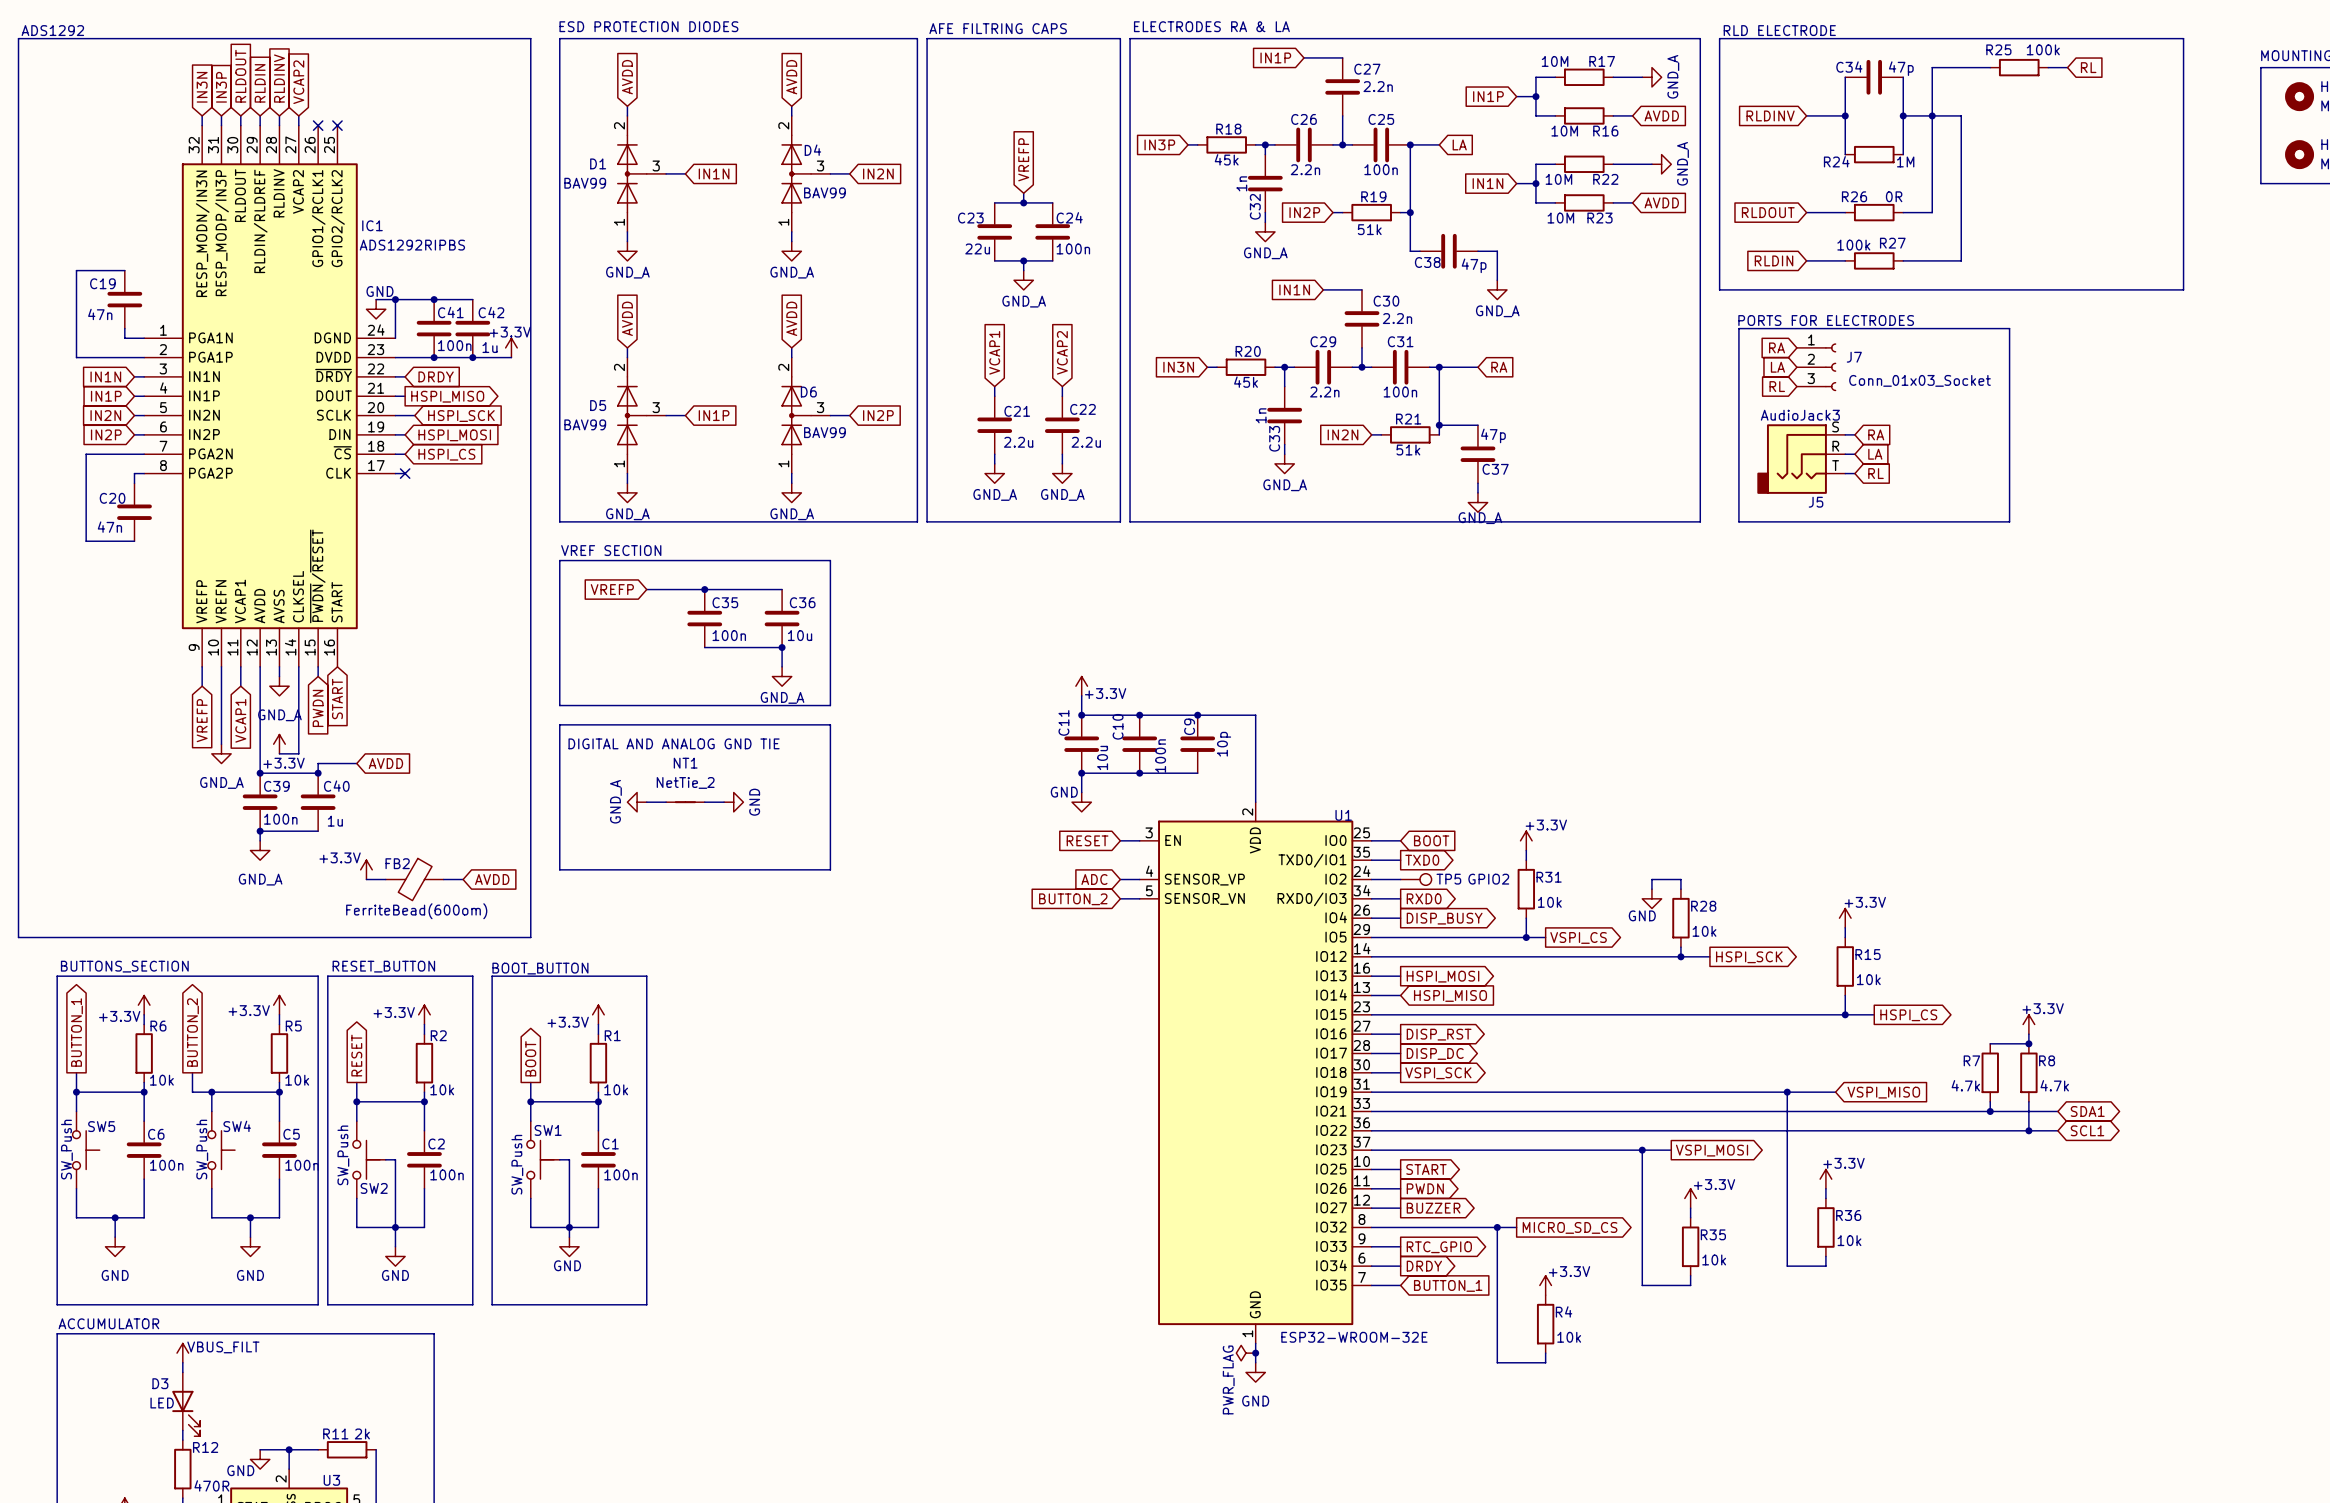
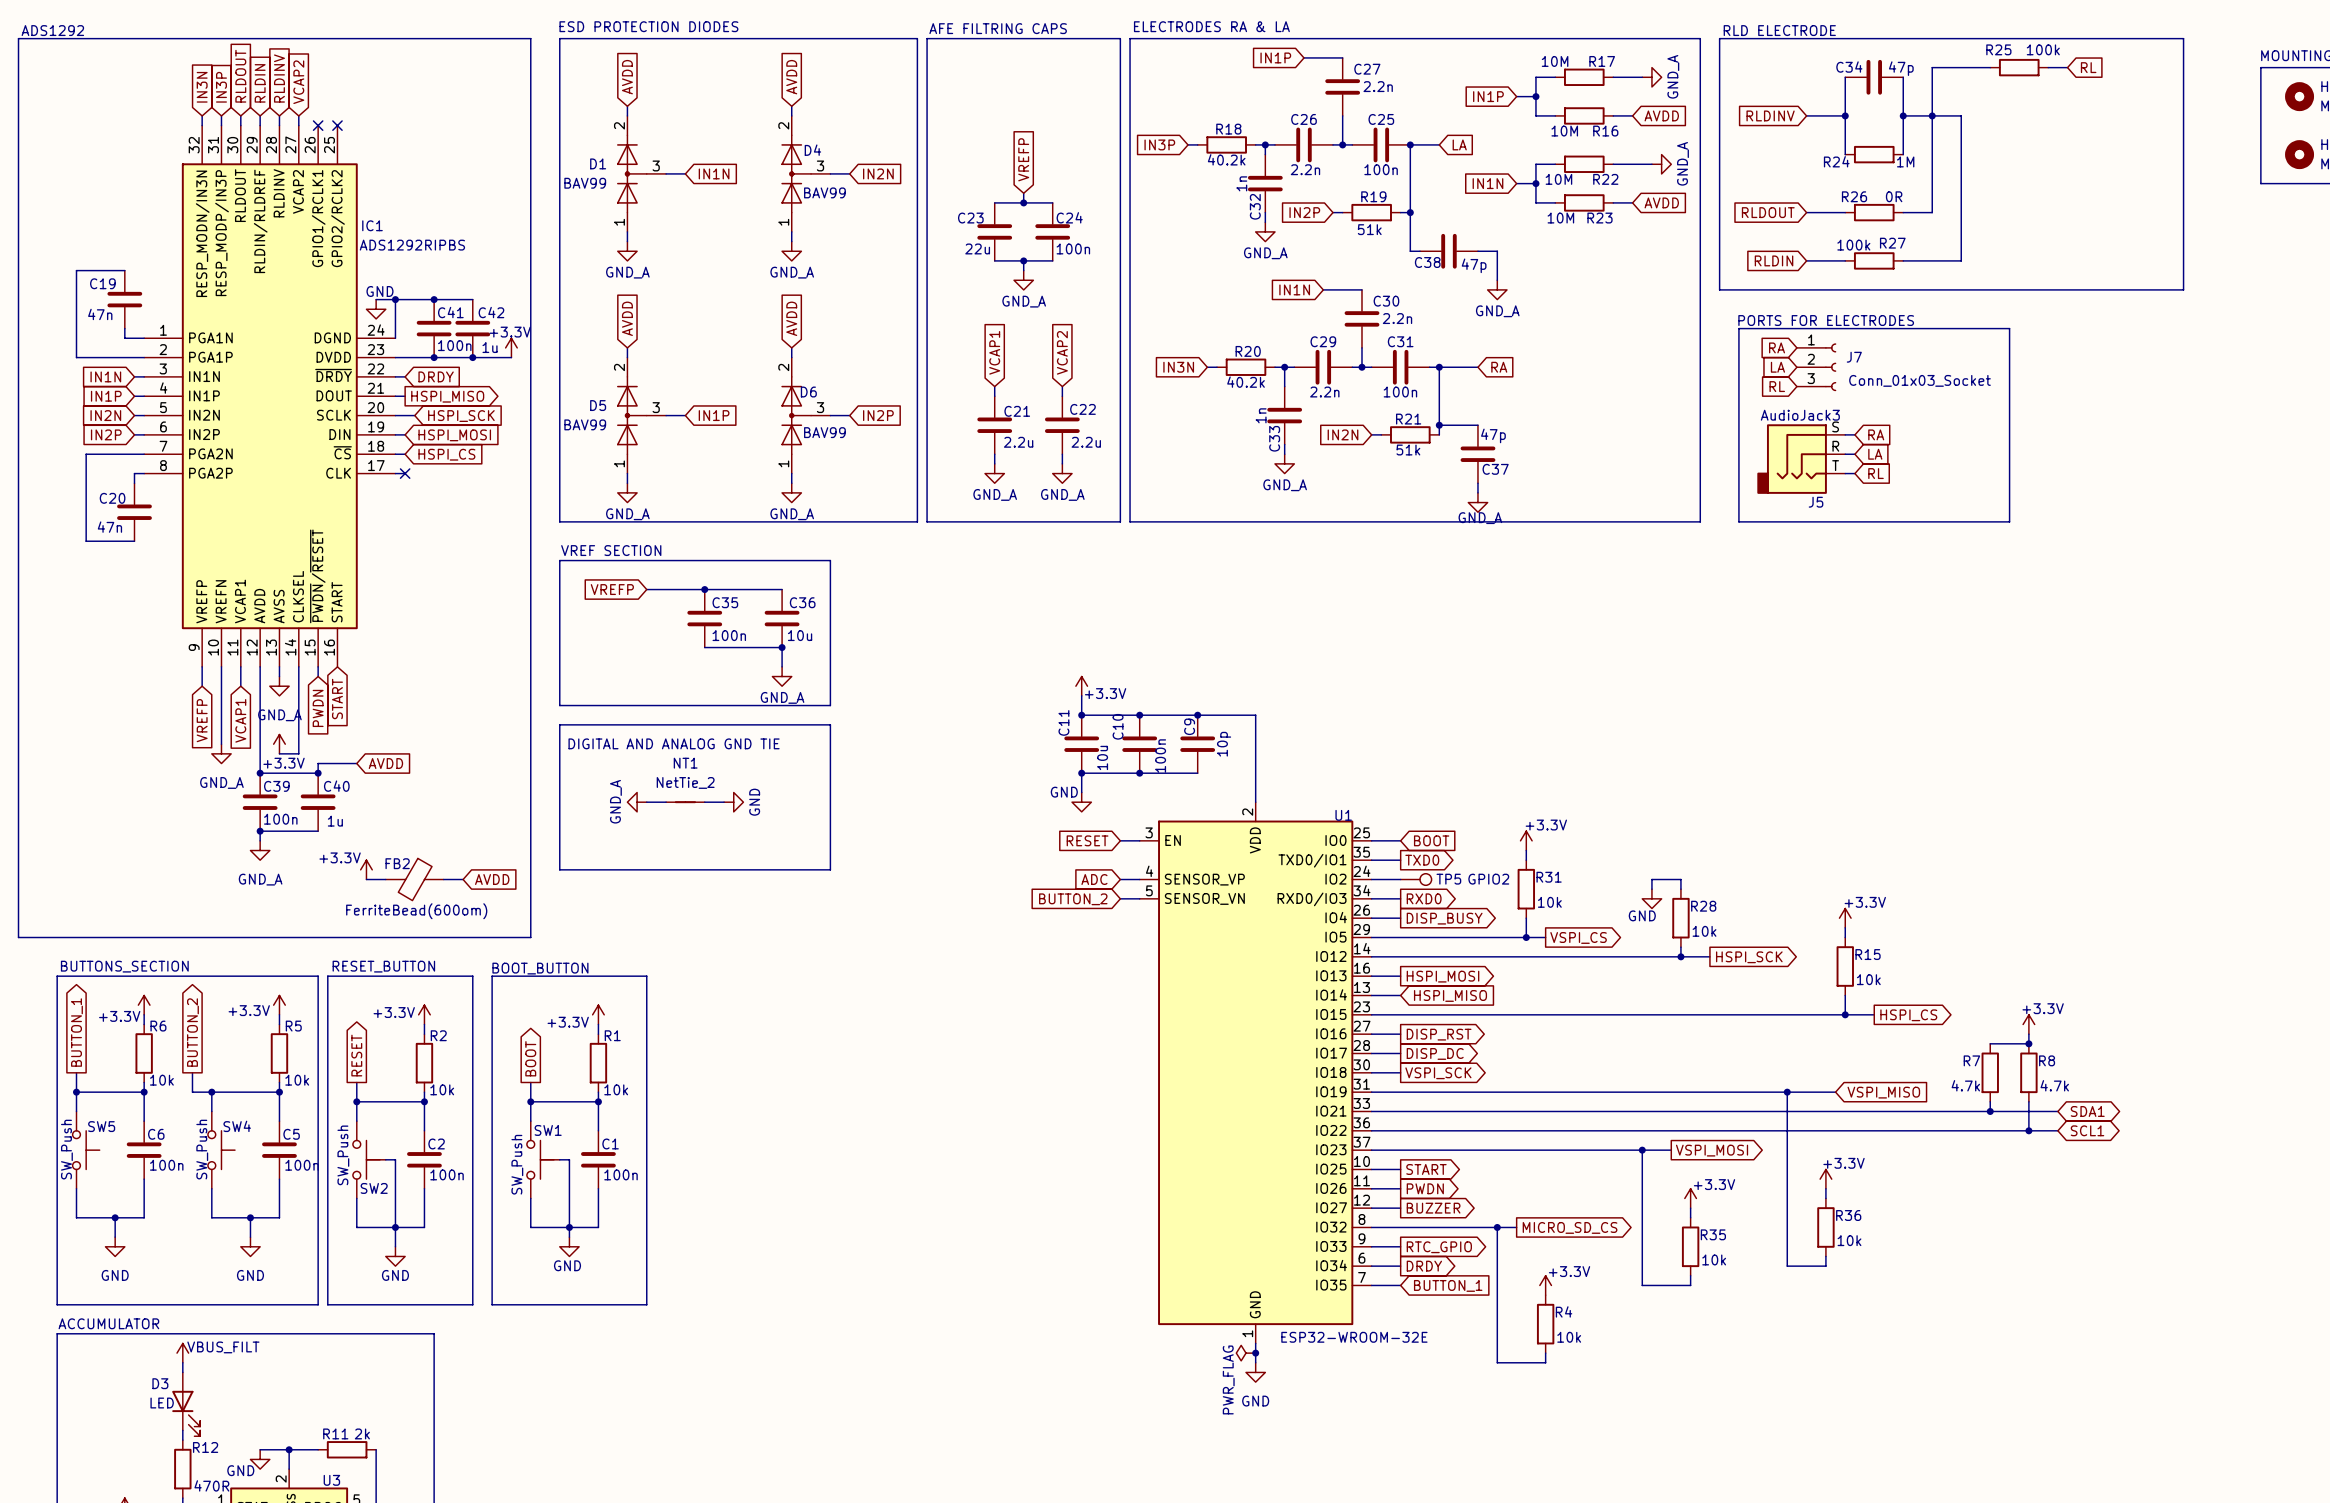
R18 value: 45k (1226, 159) -> 40.2k (1226, 159)
R20 value: 45k (1246, 382) -> 40.2k (1246, 382)

